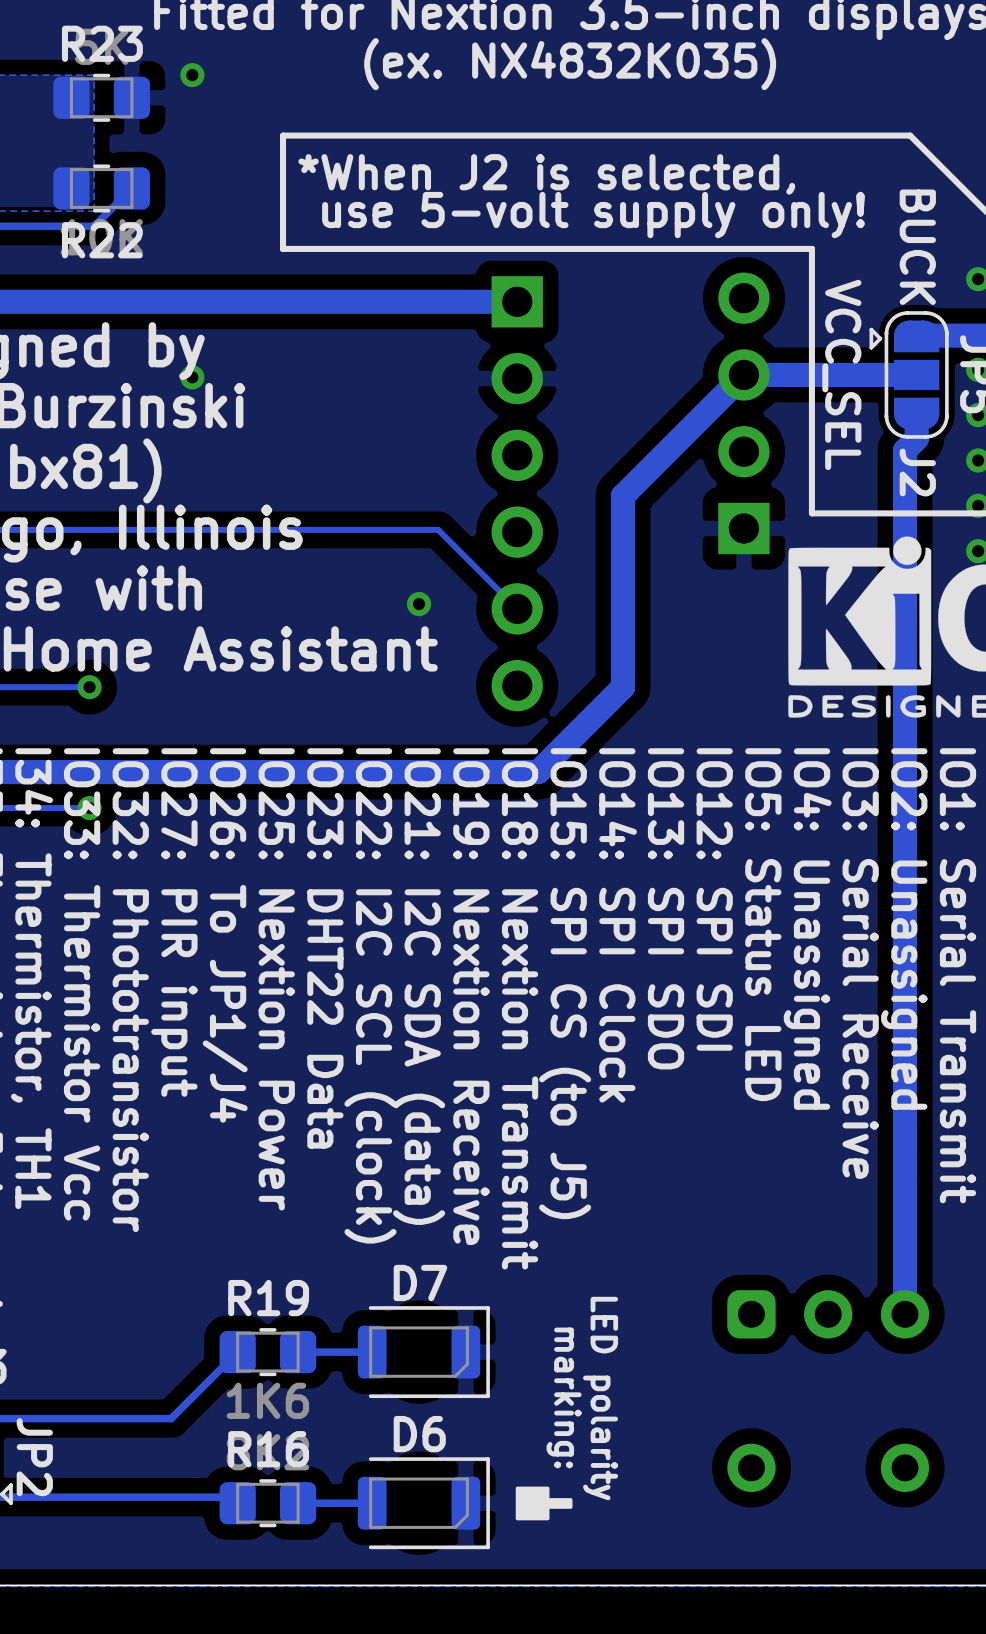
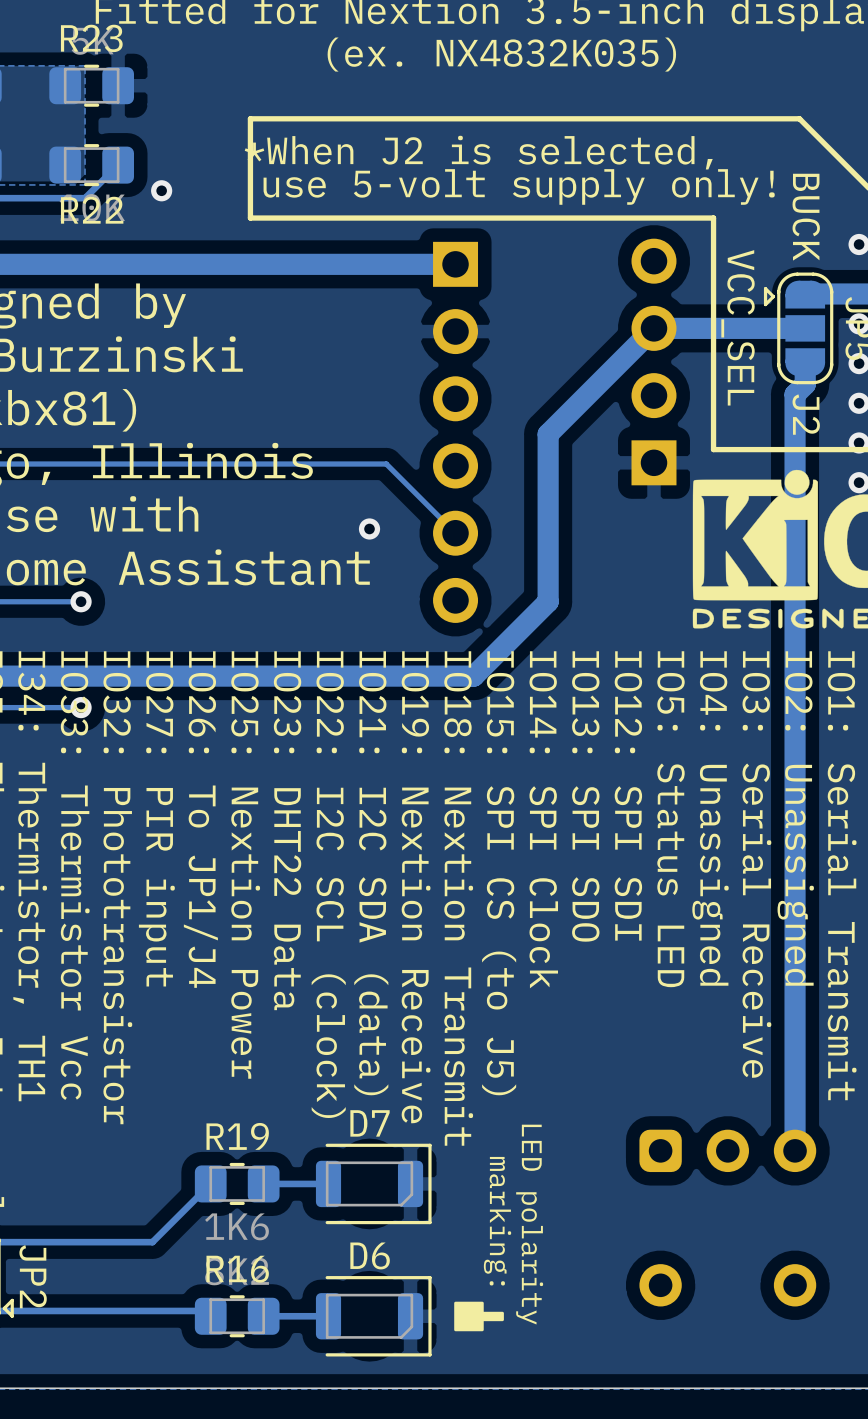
via: (192, 75) -> none
via: none -> (161, 190)
via: (192, 377) -> none

